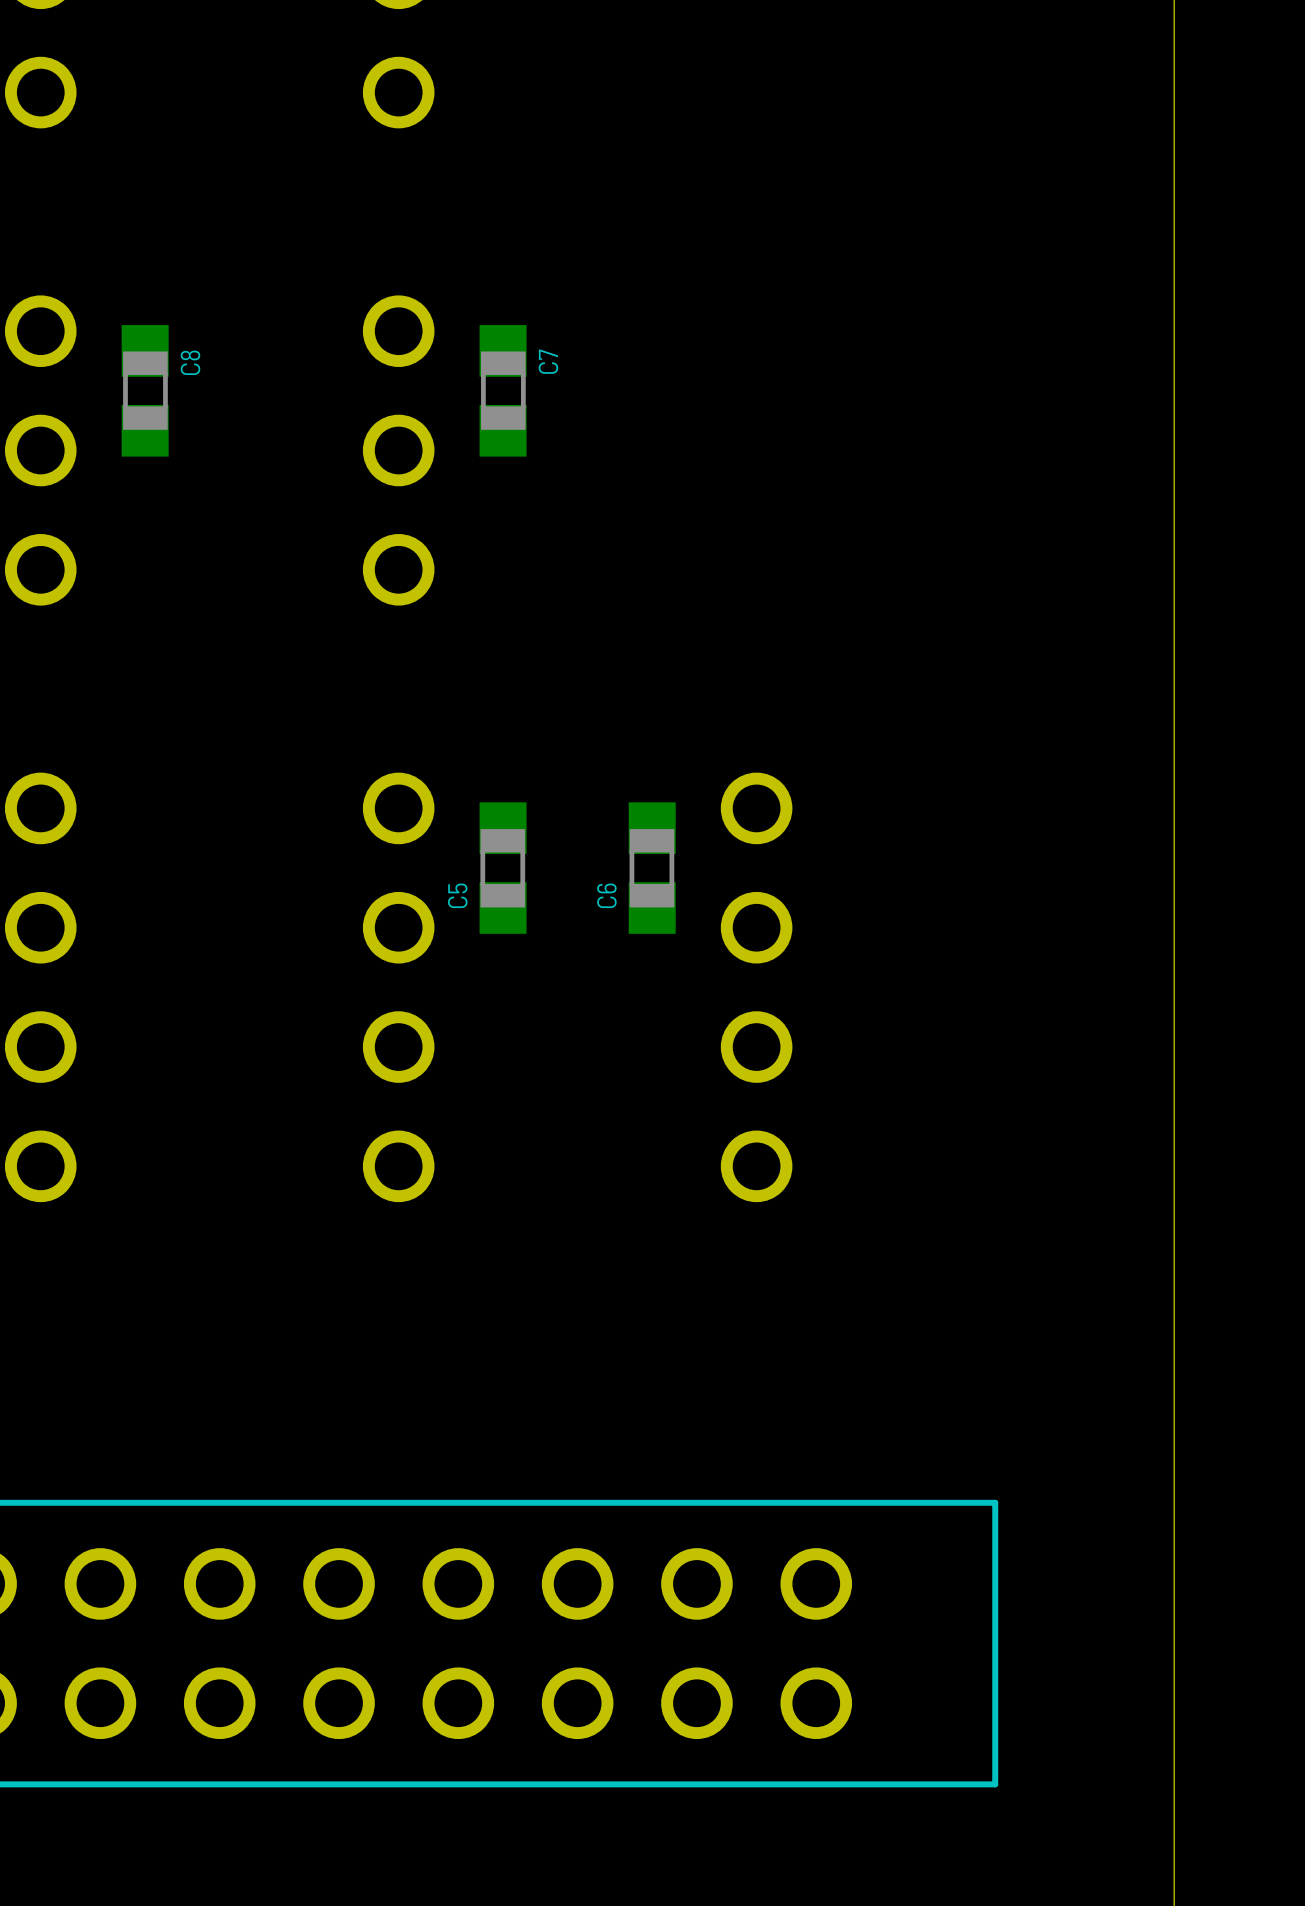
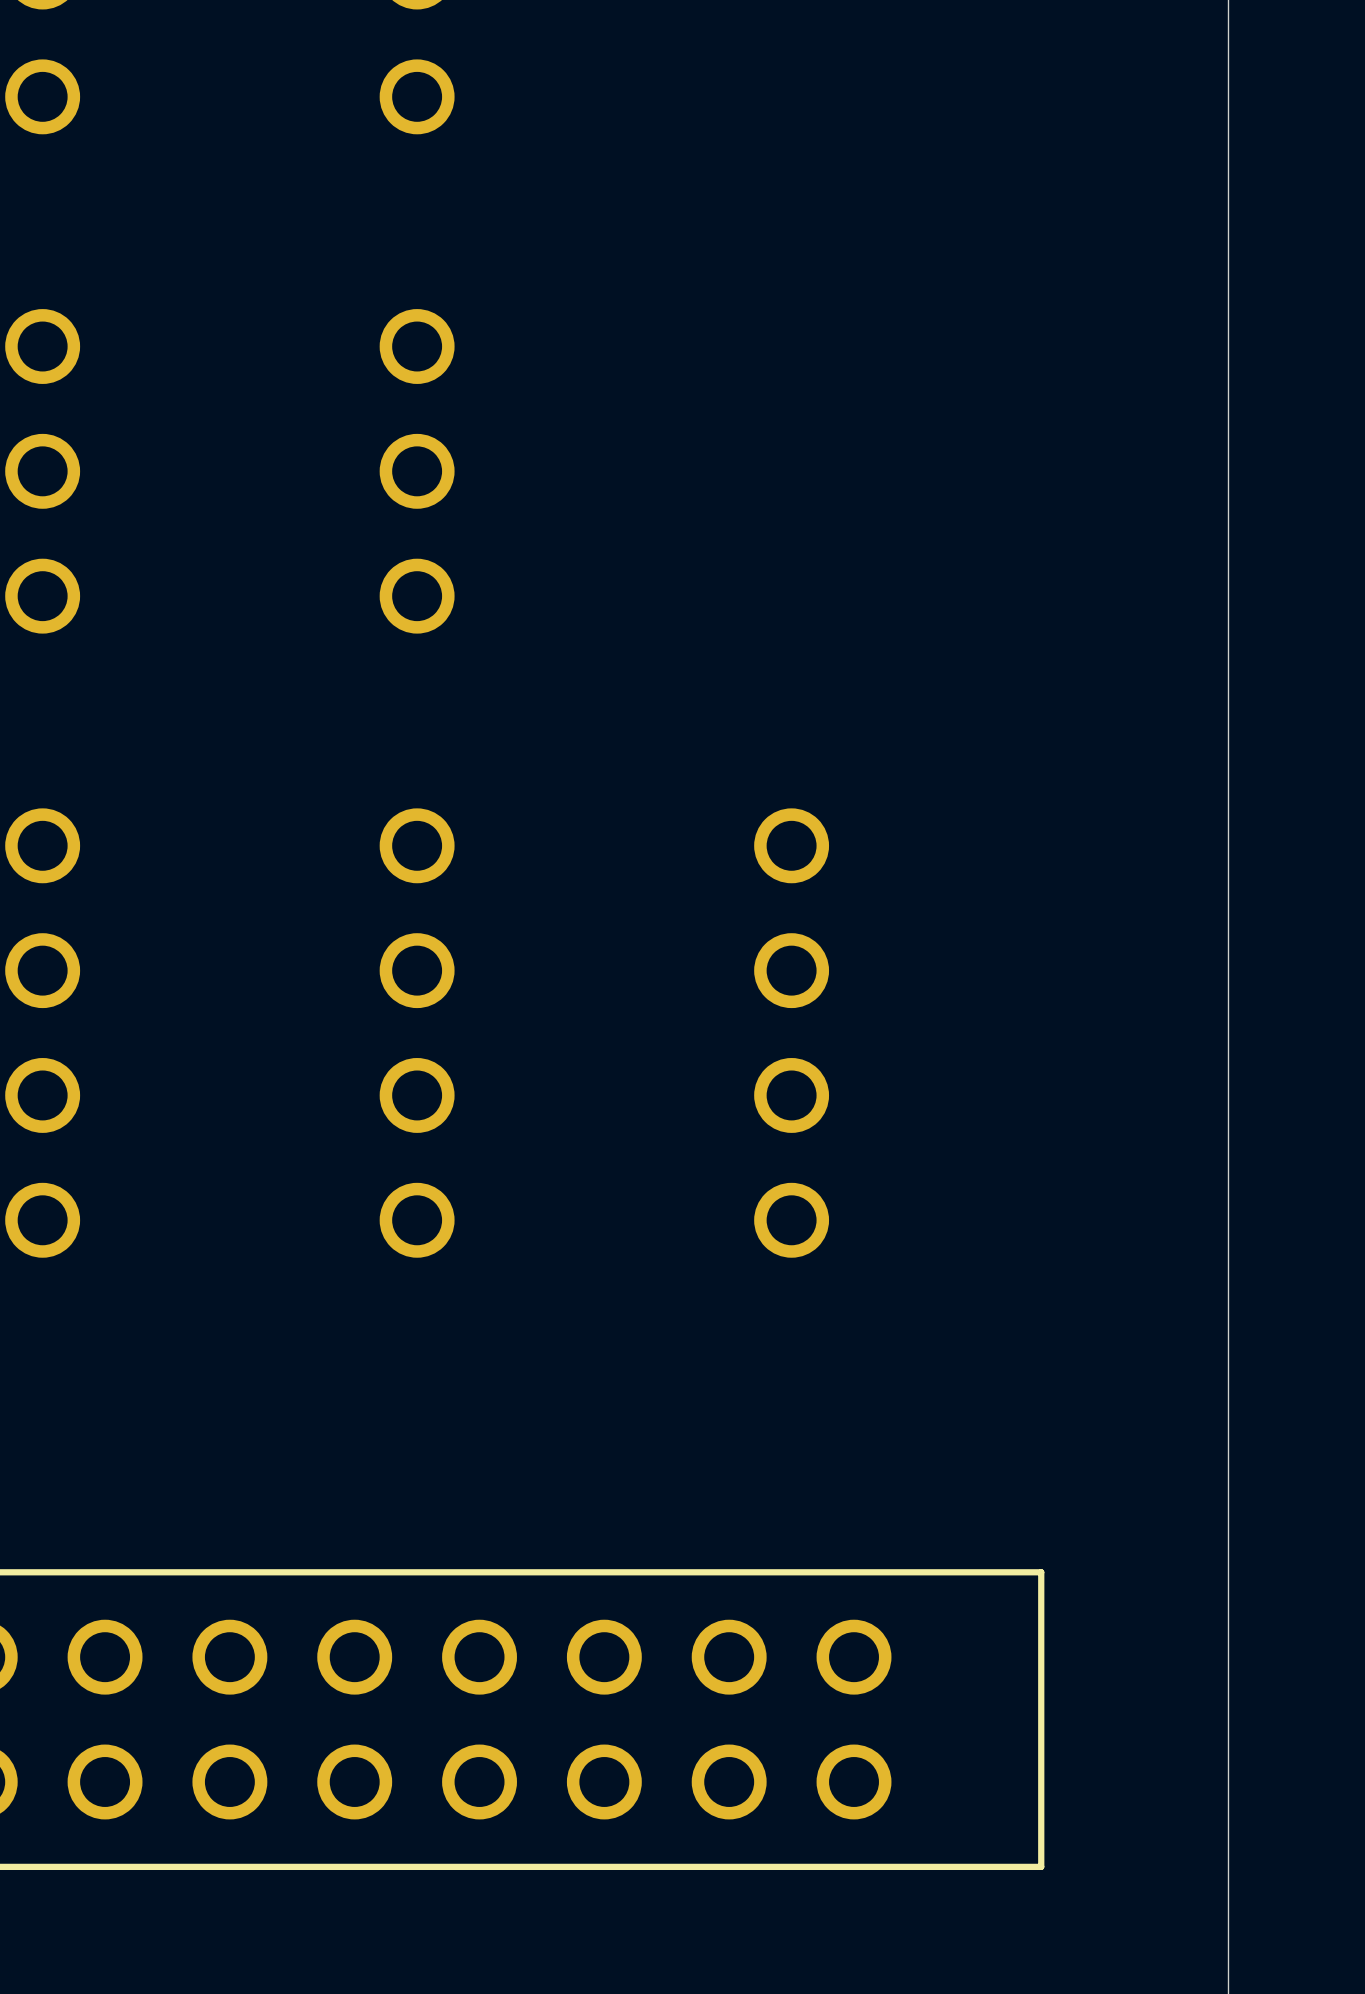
C8: (145, 390) -> none
C7: (503, 390) -> none
C5: (503, 868) -> none
C6: (652, 868) -> none

